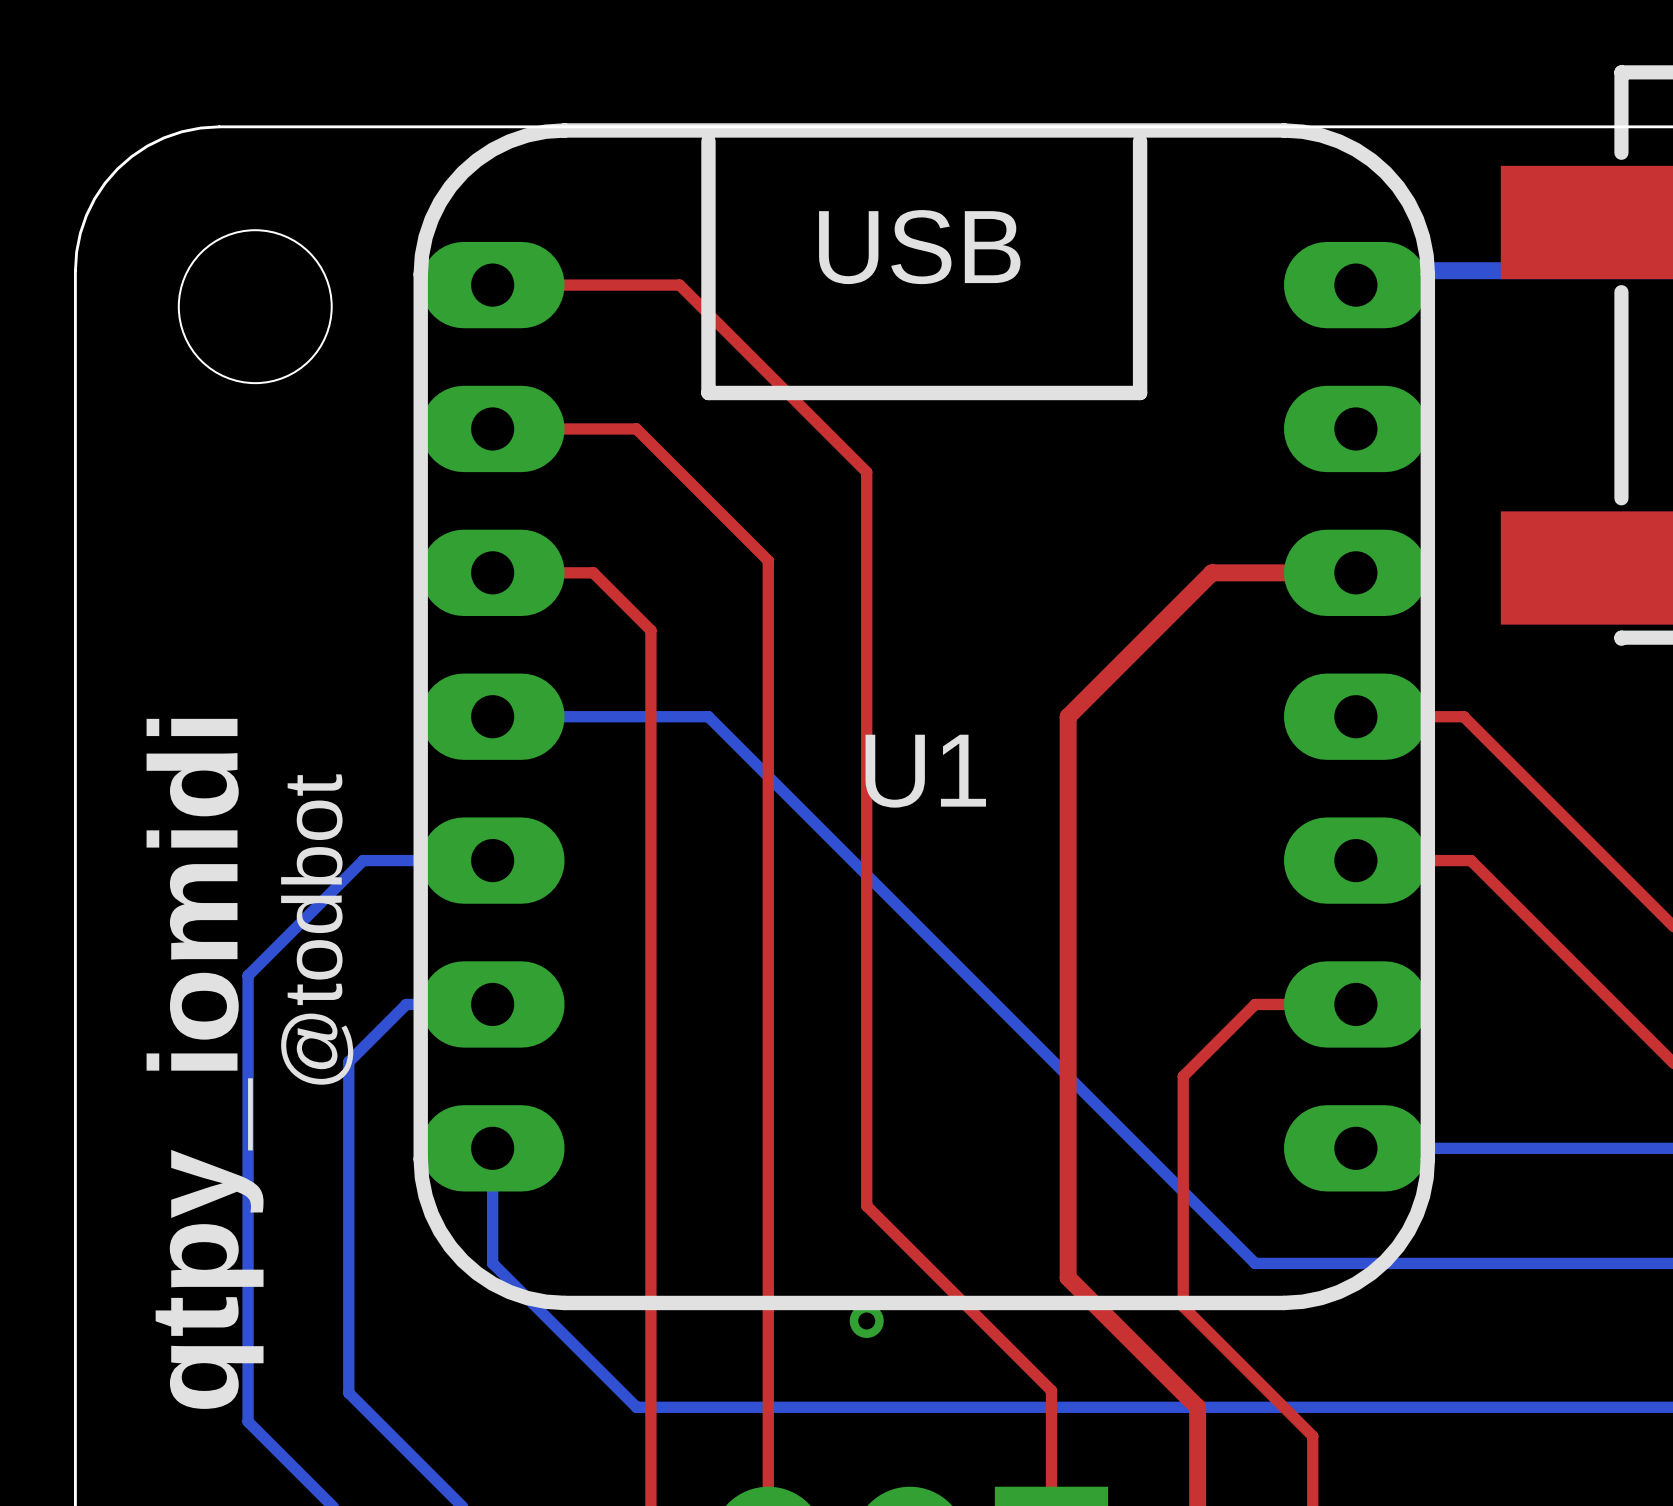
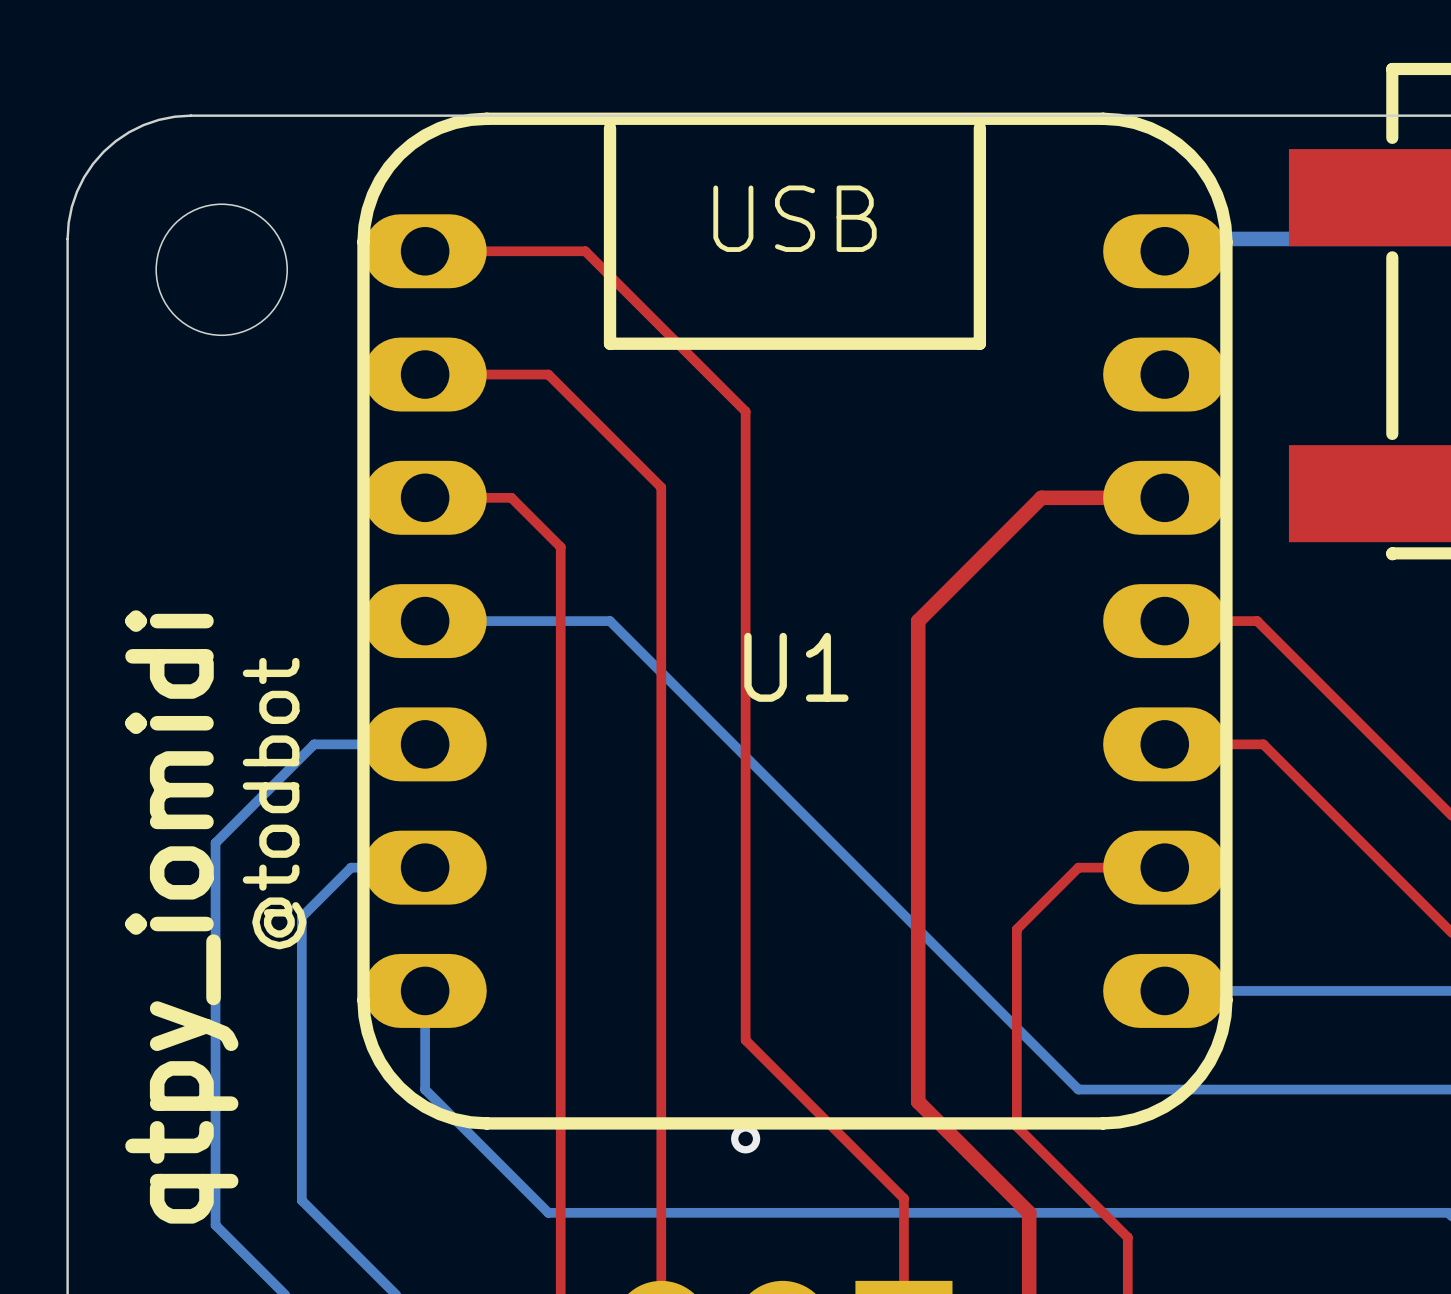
U1 footprint: [413, 123, 1436, 1311] -> [357, 112, 1233, 1130]

